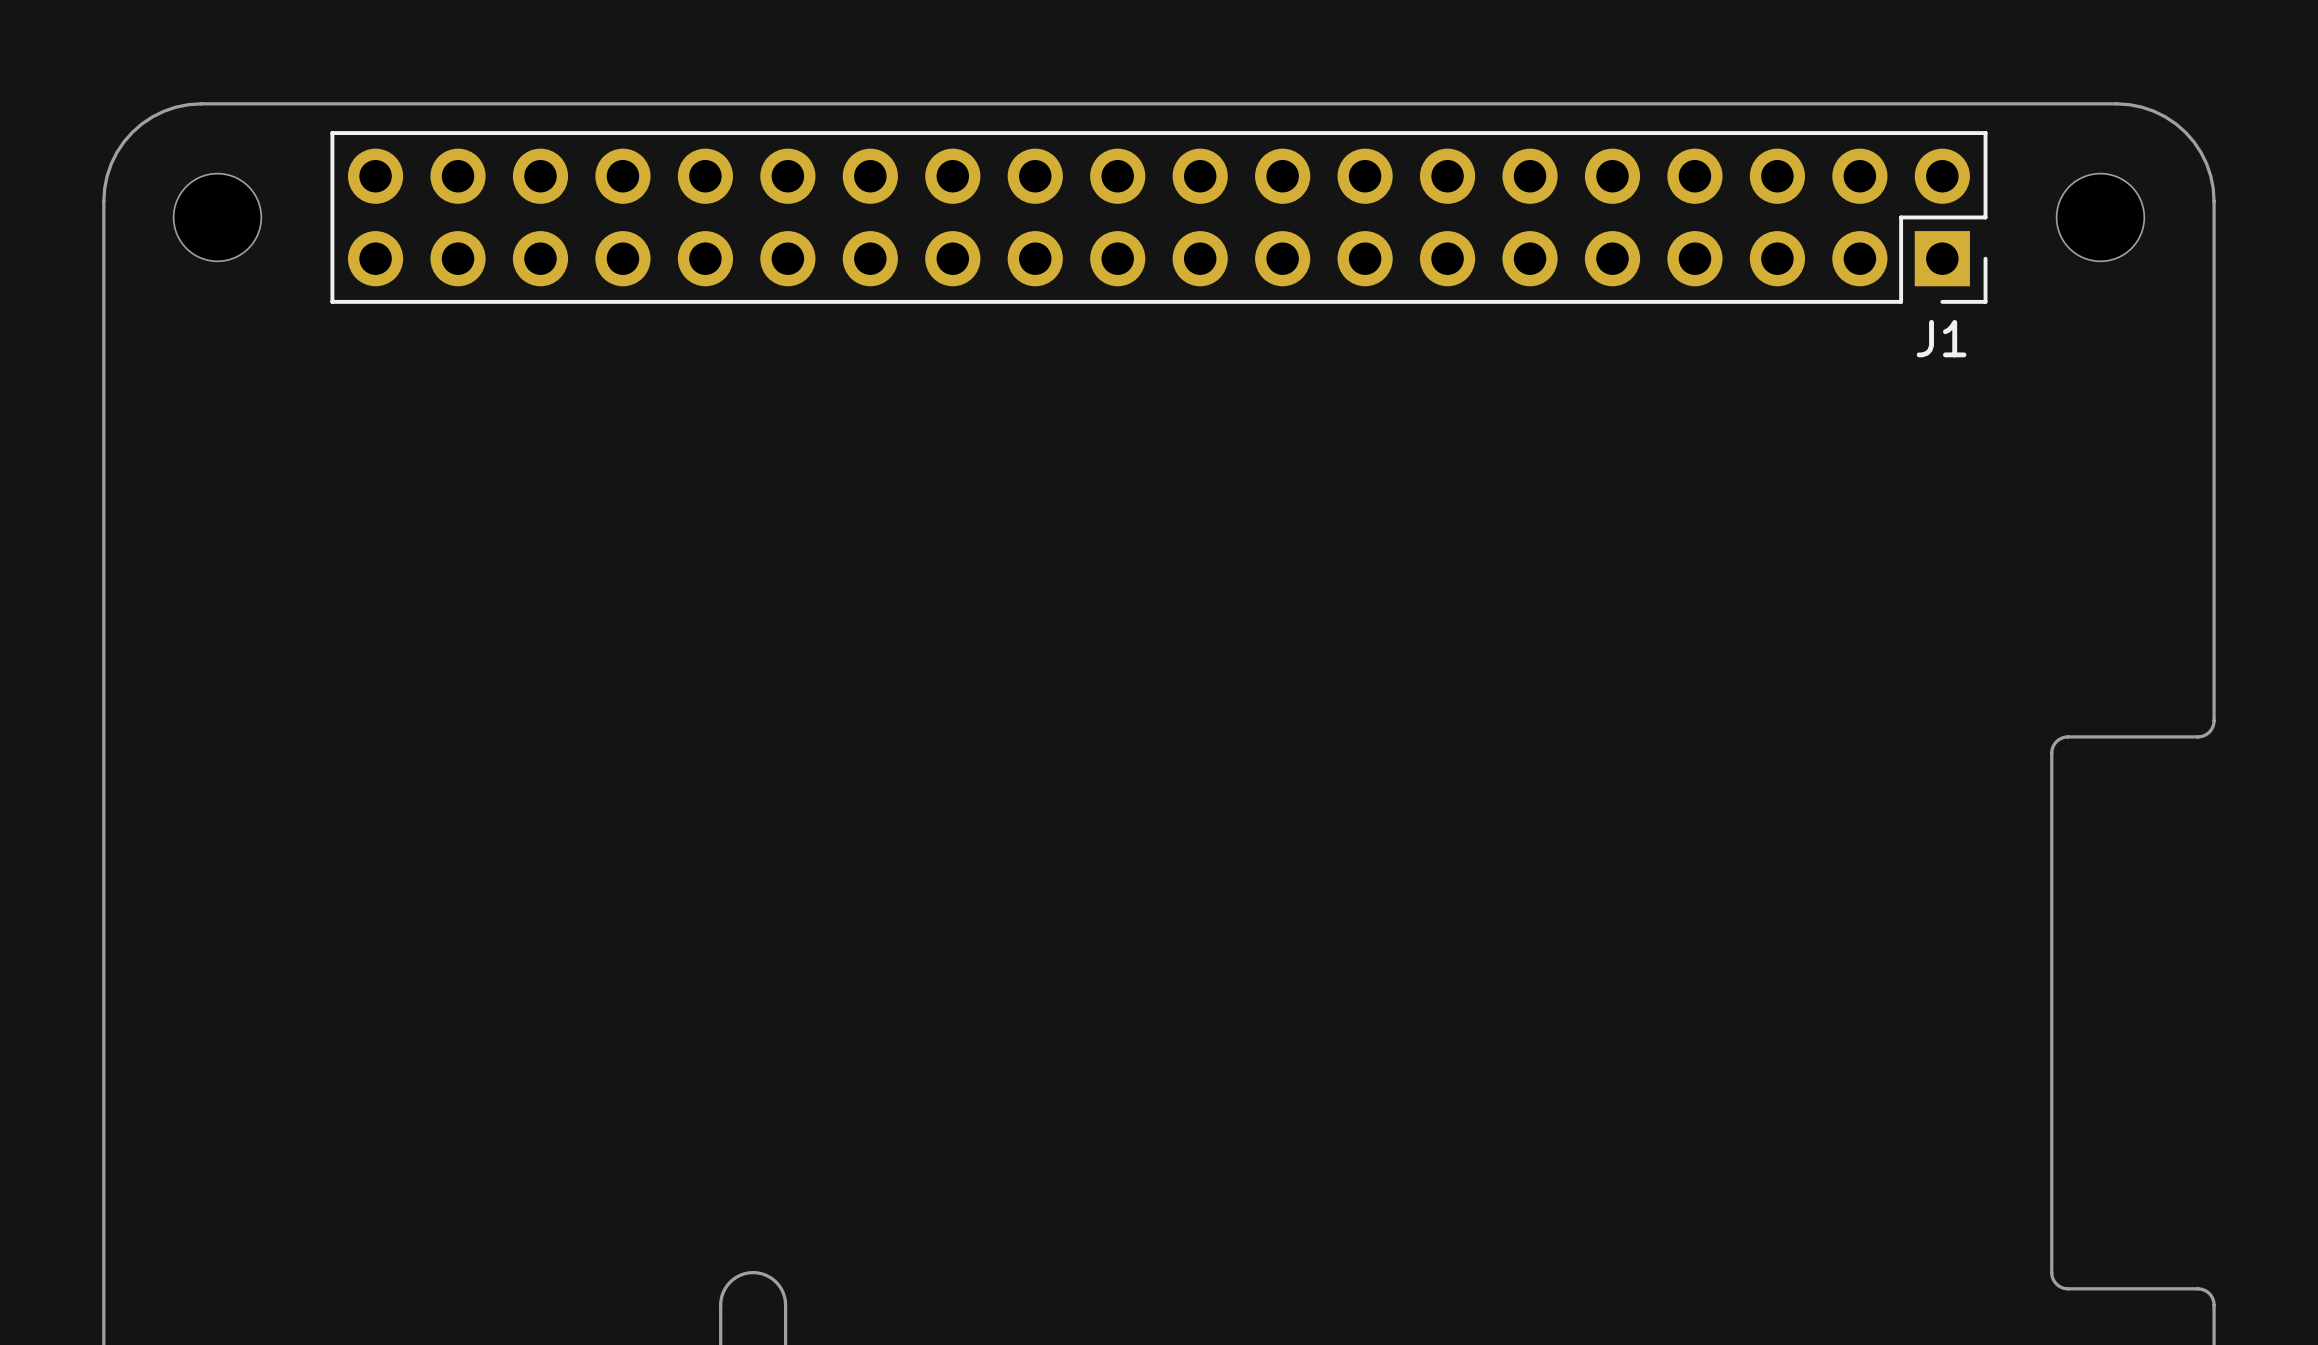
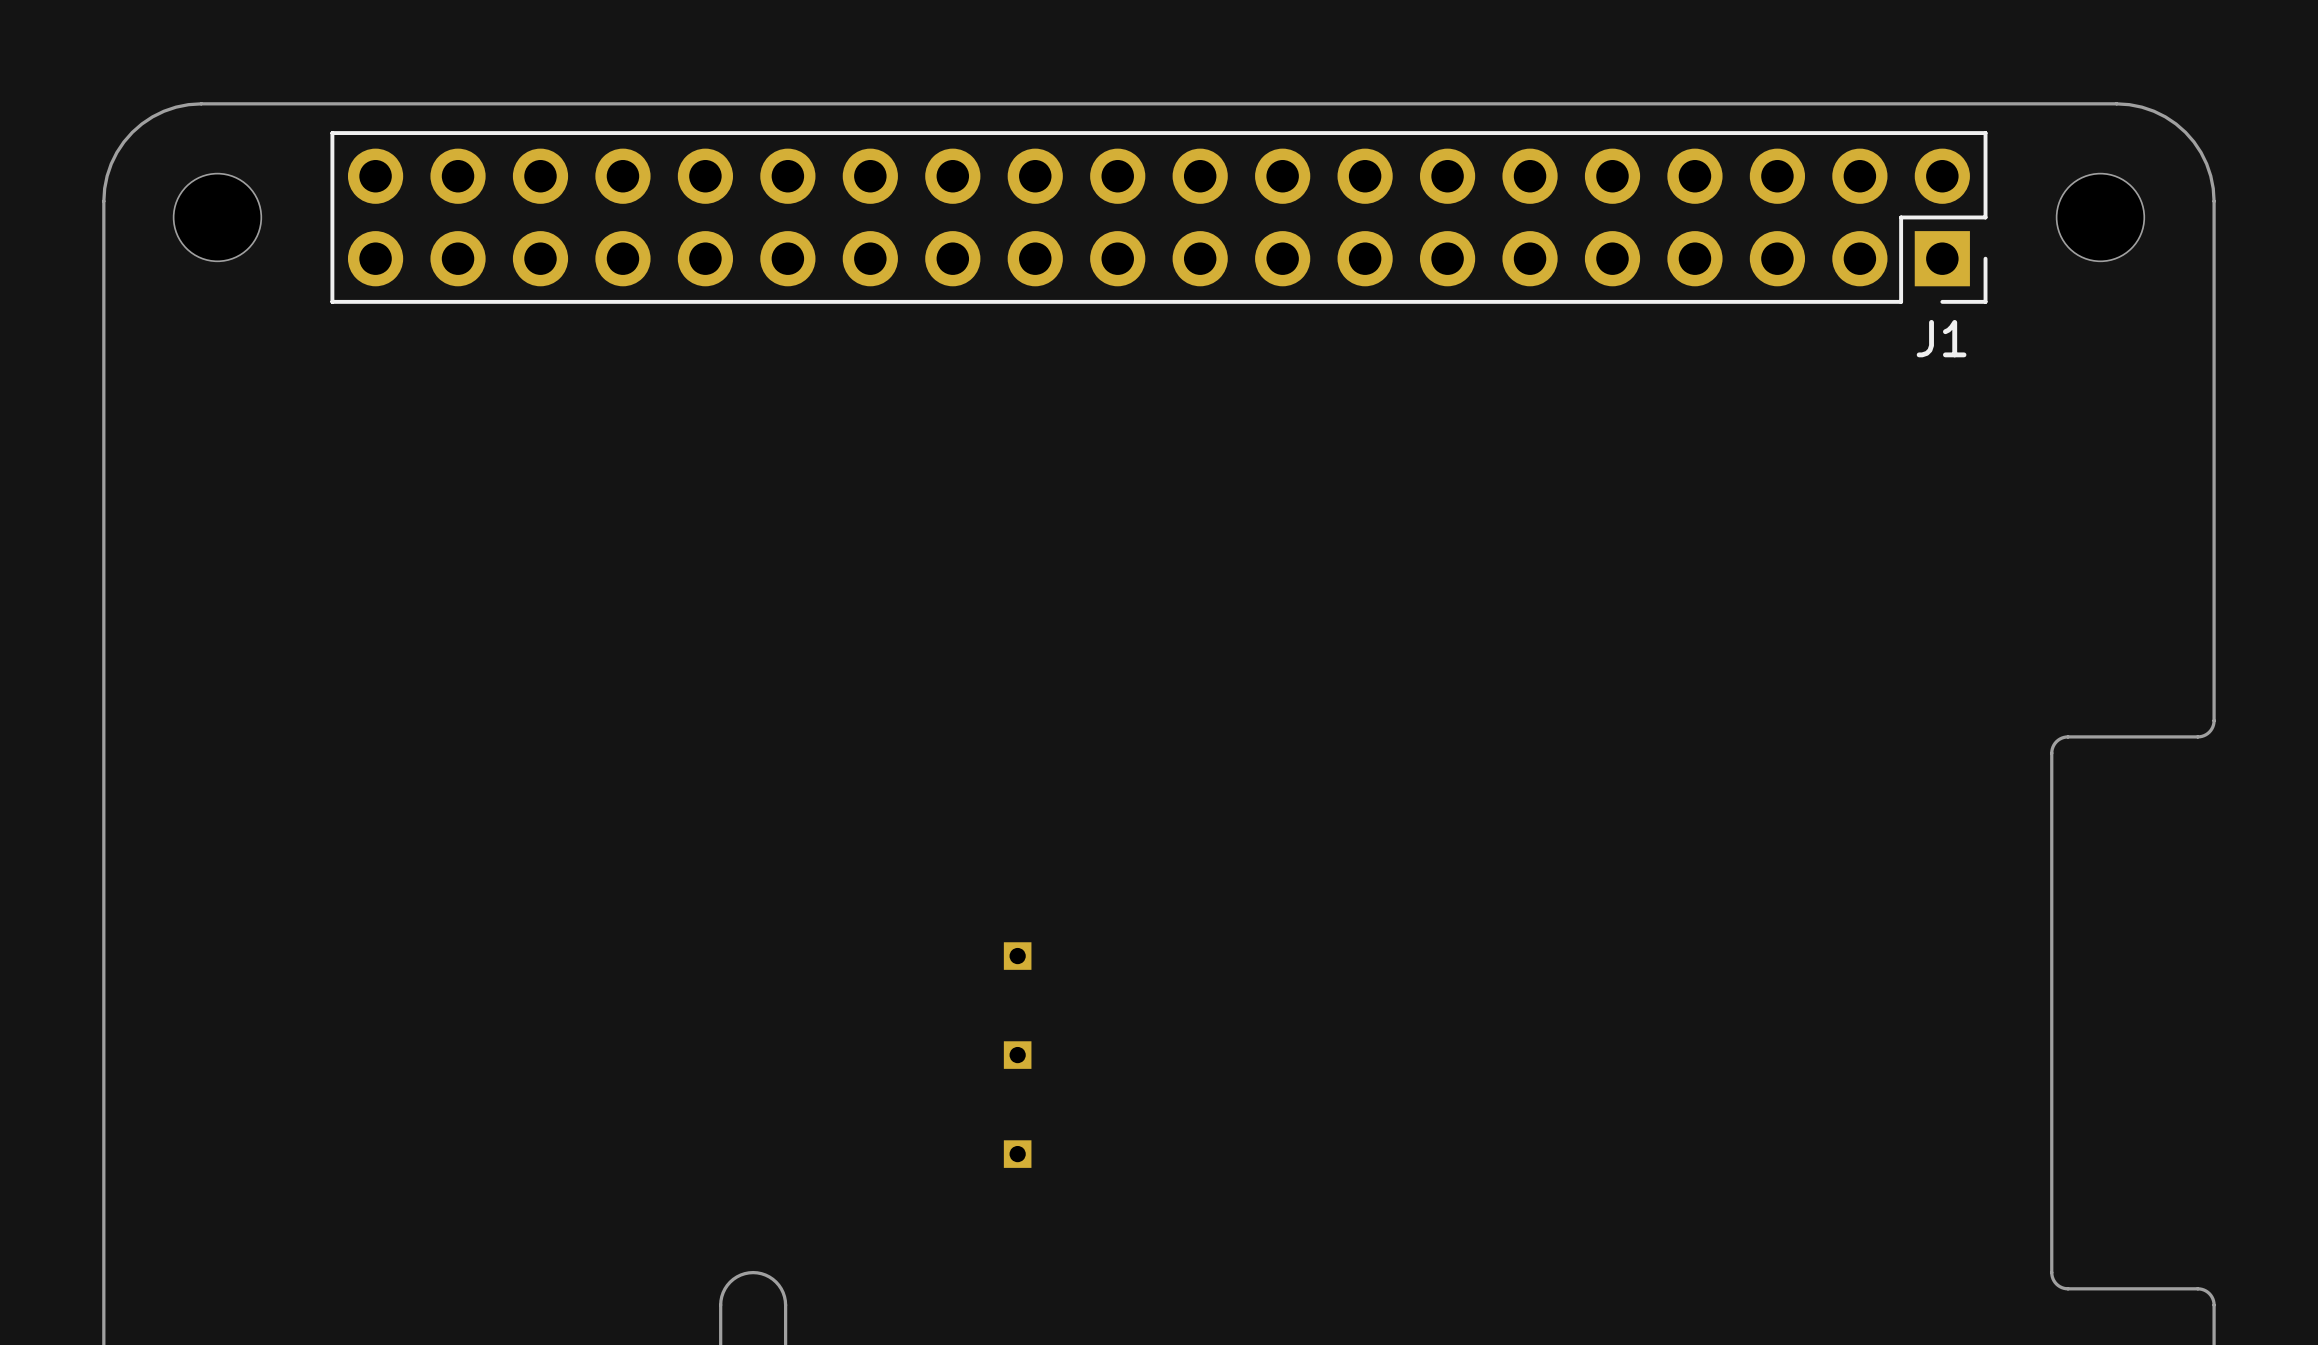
part: none -> (1017, 956)
part: none -> (1017, 1055)
part: none -> (1017, 1154)

